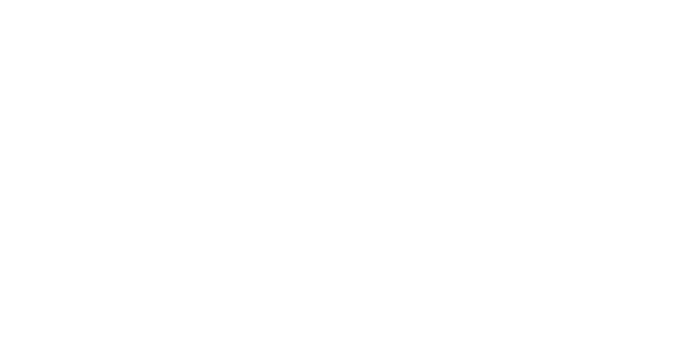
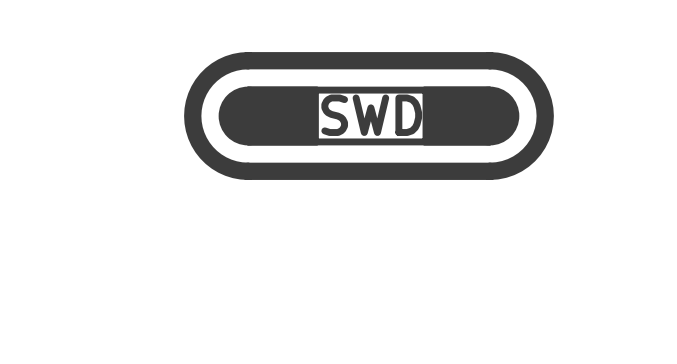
line: none -> (248, 60) (489, 60) (504, 62) (523, 72) (537, 88) (544, 108) (543, 130) (537, 143) (523, 159) (511, 167) (497, 170) (248, 171) (234, 169) (216, 161) (202, 147) (194, 129) (193, 109) (199, 90) (211, 74) (228, 64) (248, 60)
drawing: none -> [218, 86, 520, 146]
text: none -> SWD (371, 115)

